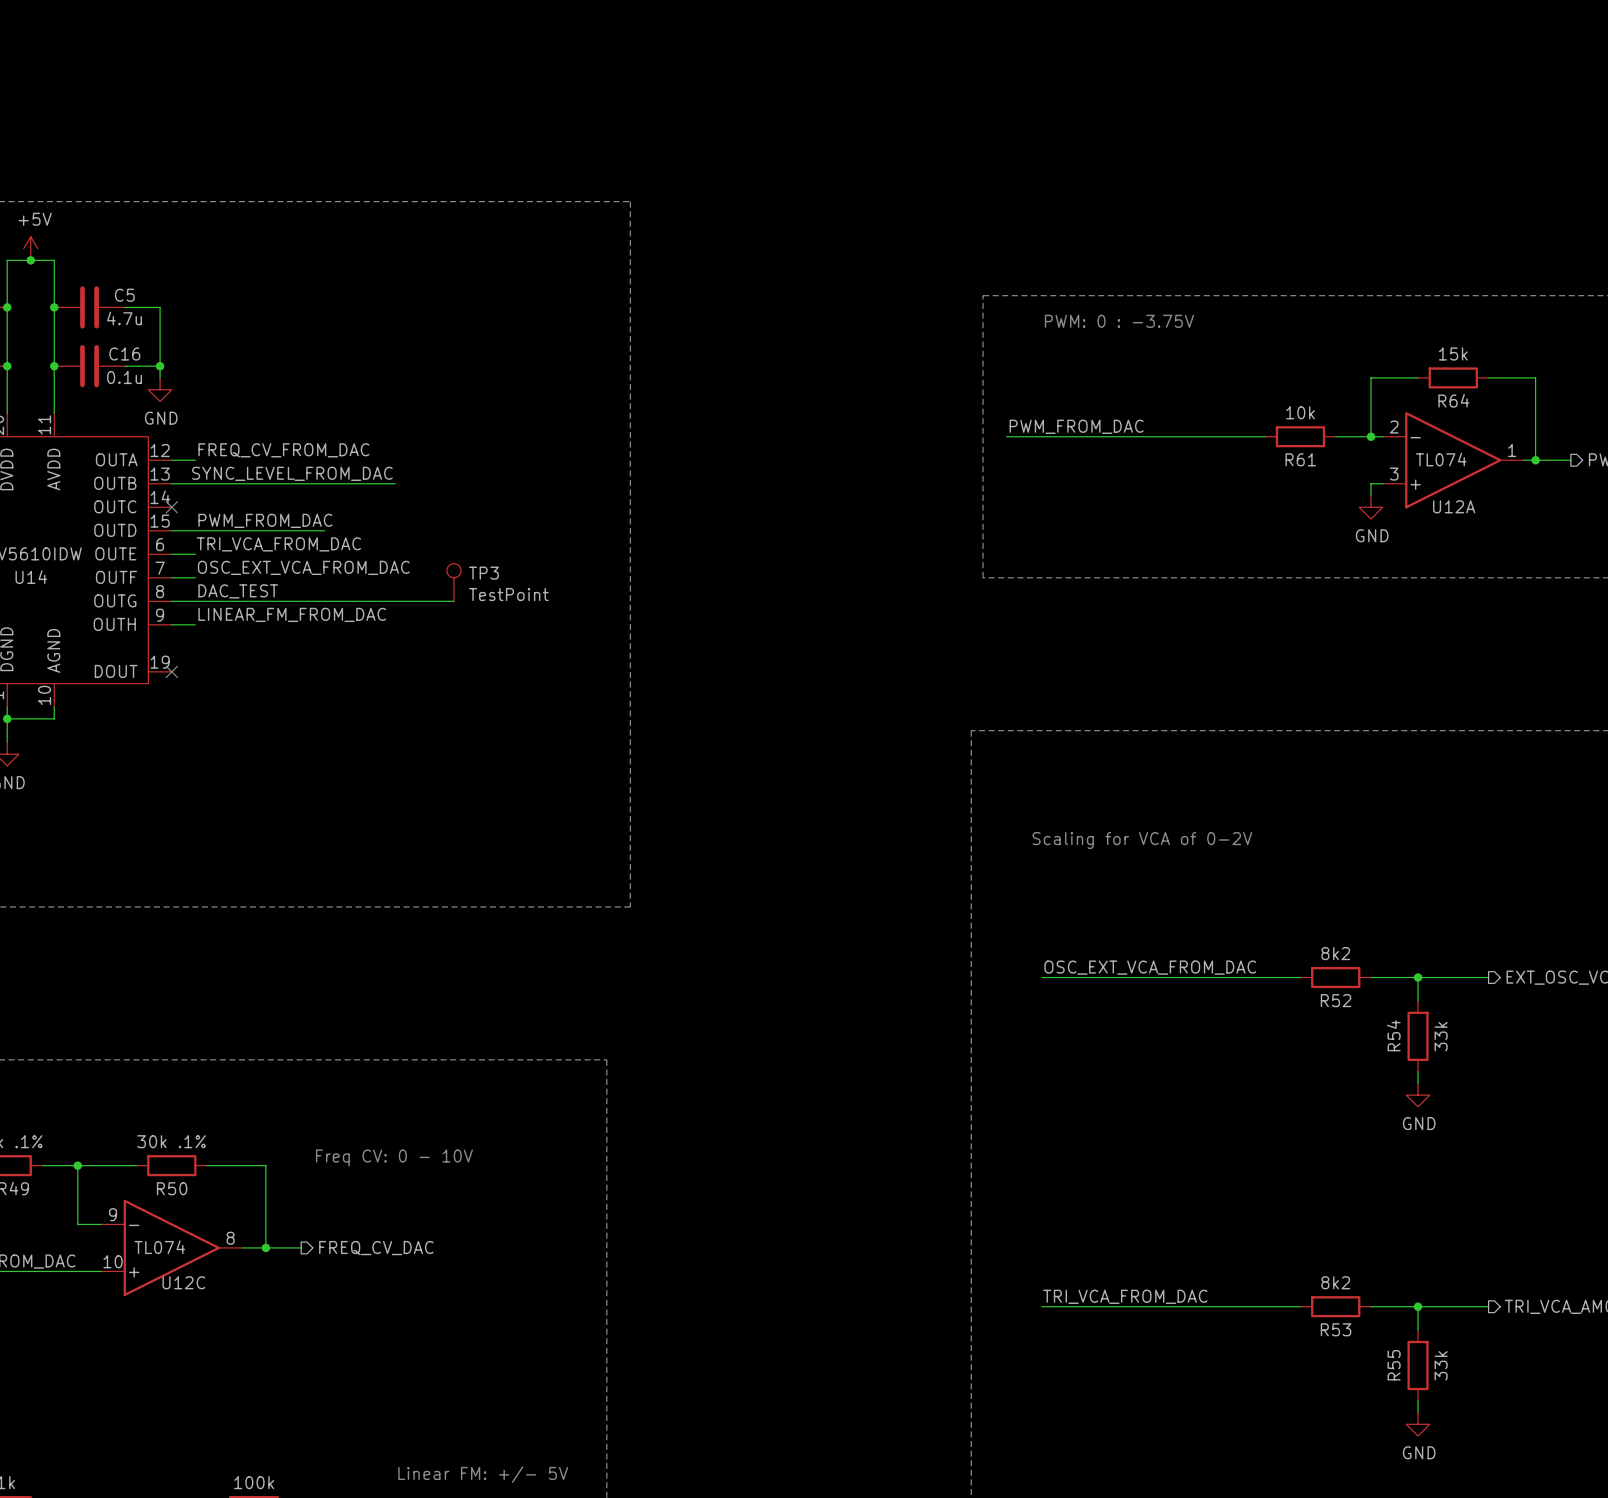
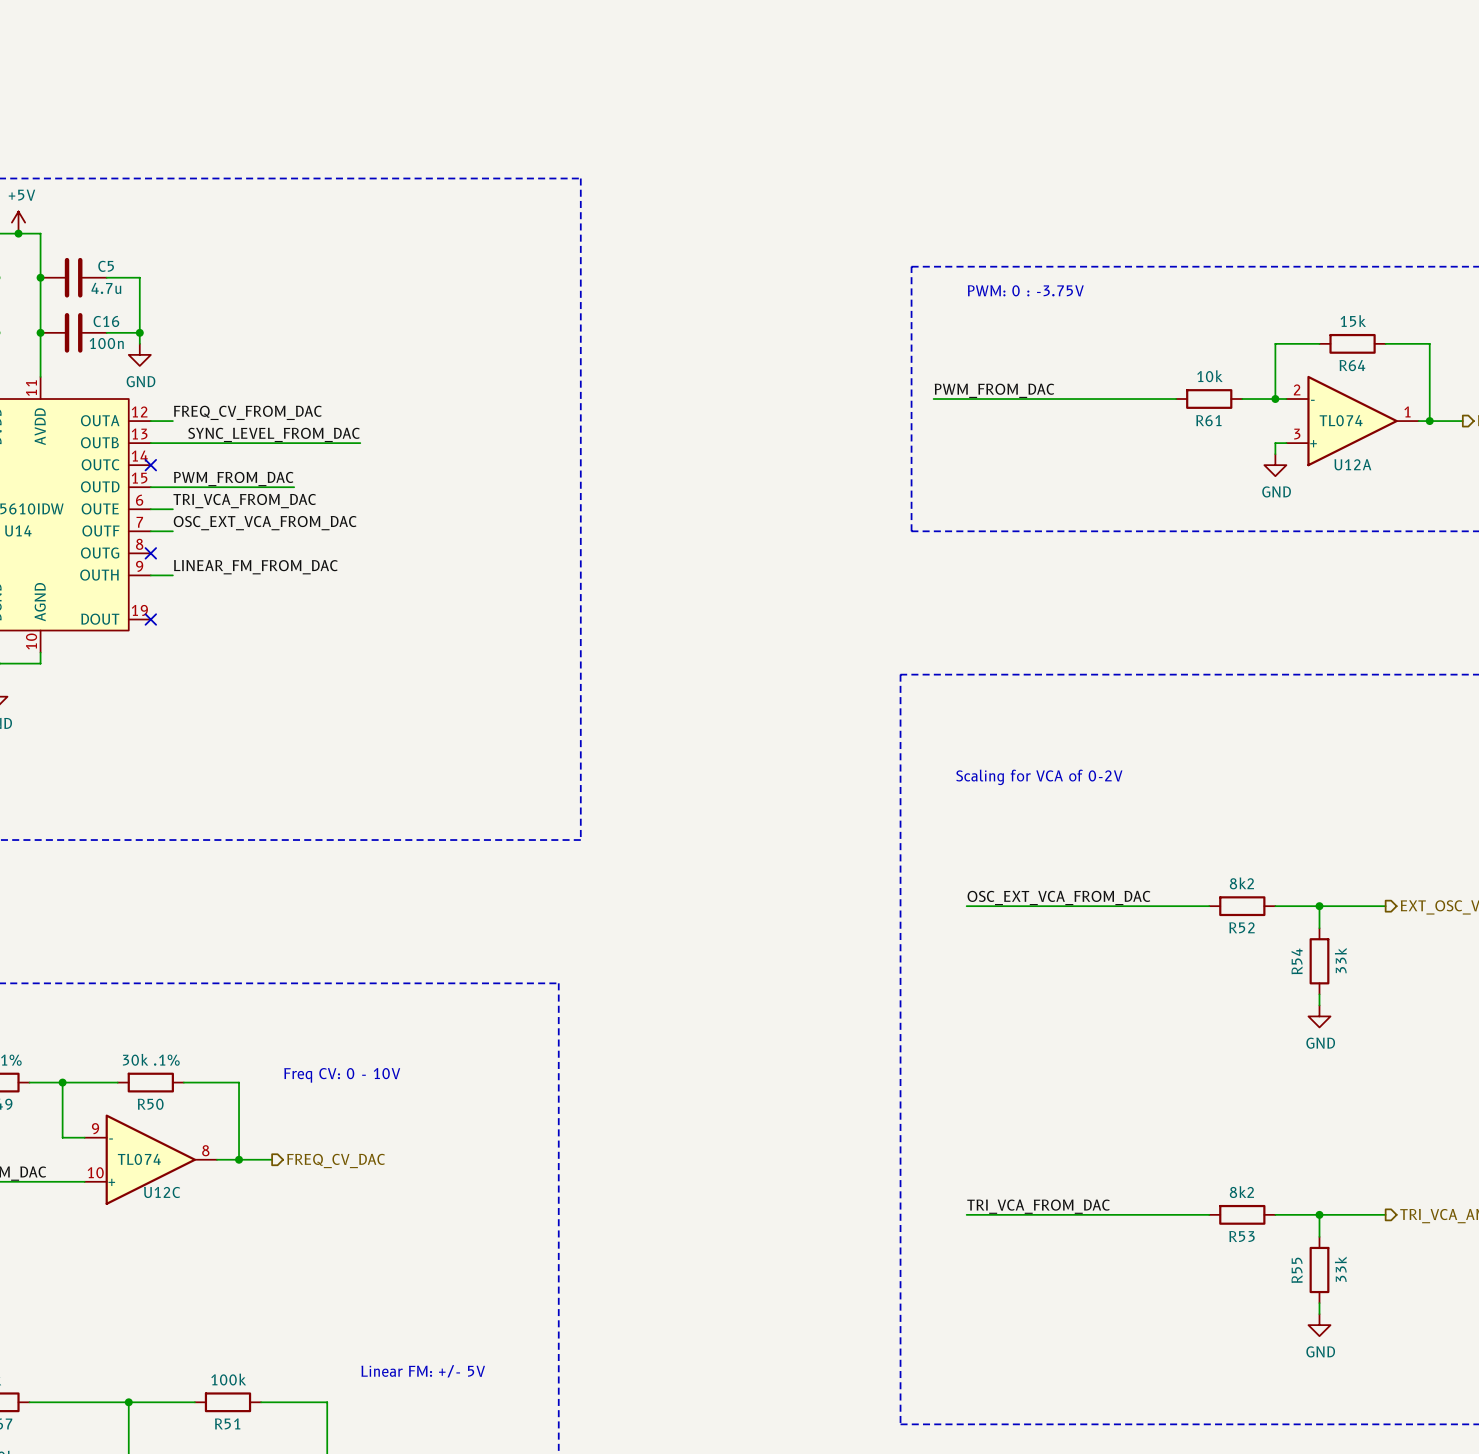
C16 value: 0.1u (124, 377) -> 100n (106, 343)
TP3: TestPoint (453, 582) -> none
label: DAC_TEST (238, 591) -> none
wire: (171, 601) (453, 601) -> none
no-connect mark: none -> (150, 553)

